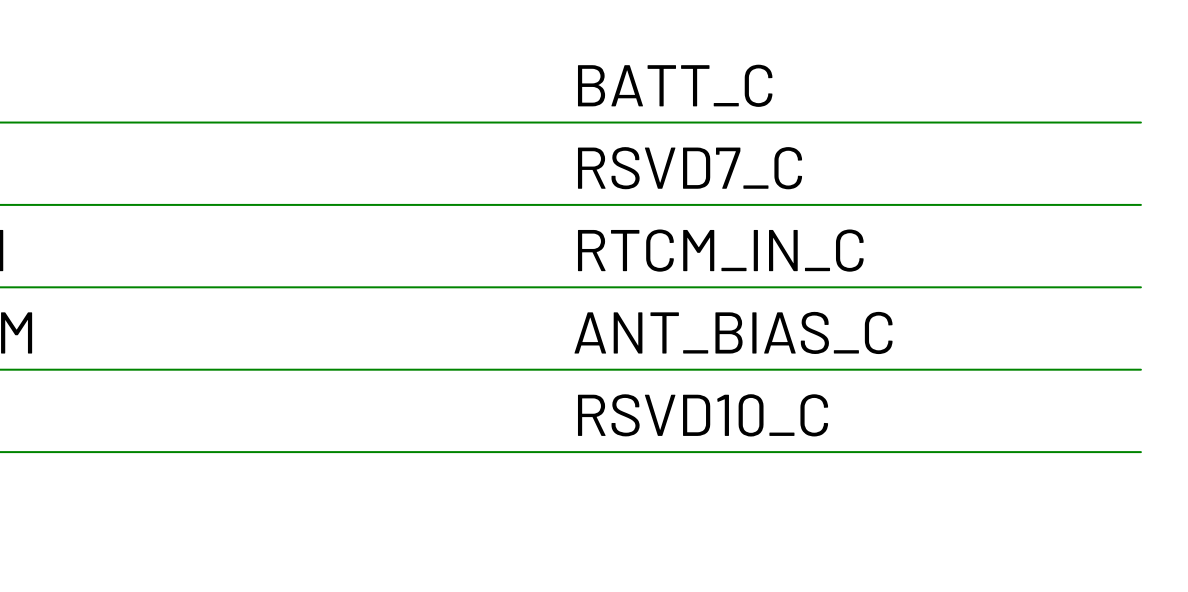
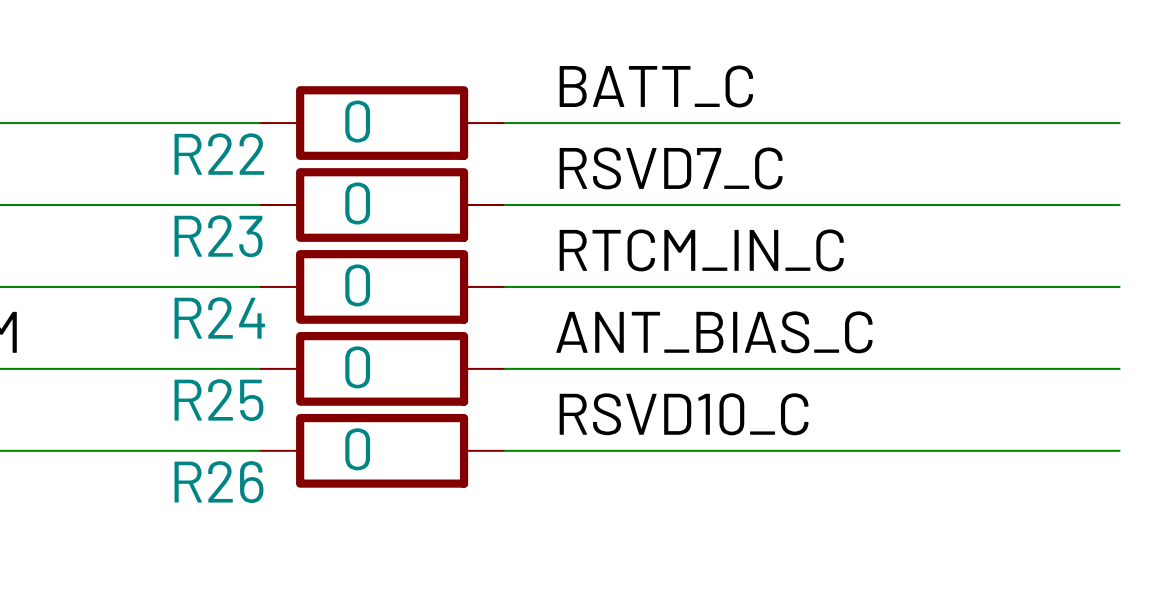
wire: (275, 122) (522, 122) -> none
R22: none -> 0 (382, 123)
wire: (275, 204) (522, 204) -> none
R23: none -> 0 (382, 205)
wire: (275, 287) (522, 287) -> none
R24: none -> 0 (382, 286)
wire: (275, 369) (522, 369) -> none
R25: none -> 0 (382, 368)
wire: (275, 452) (522, 452) -> none
R26: none -> 0 (382, 450)

